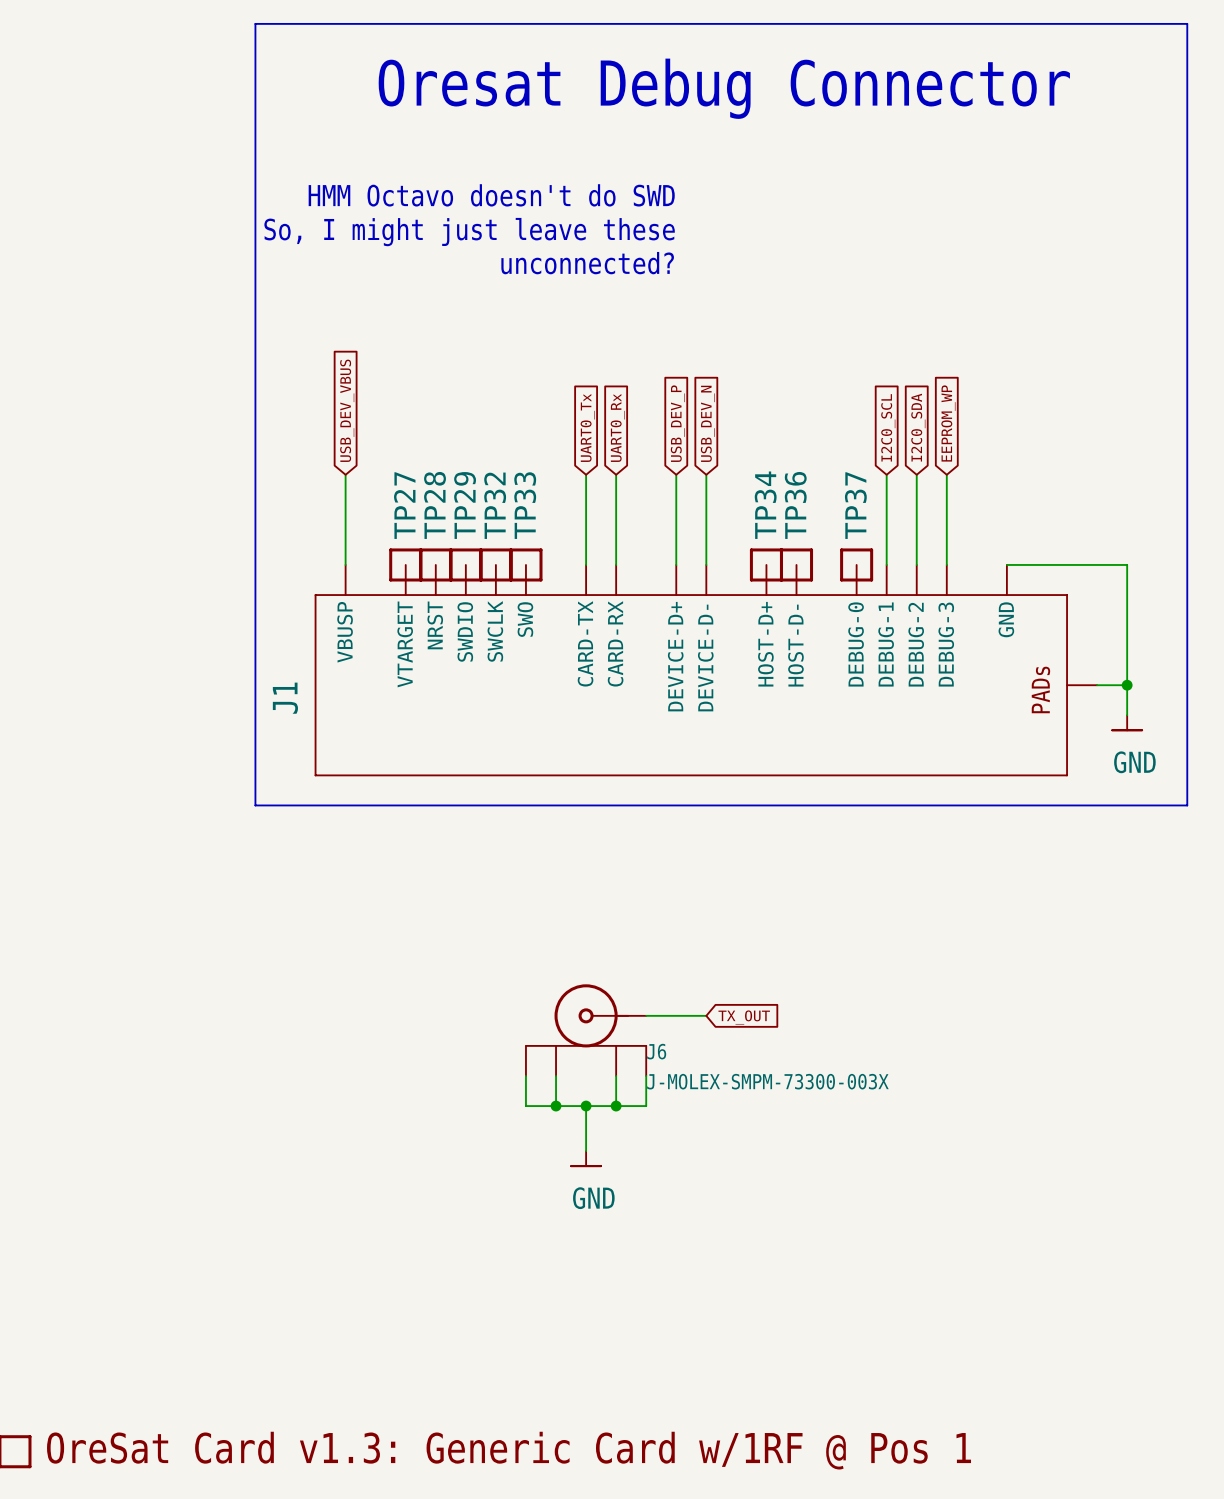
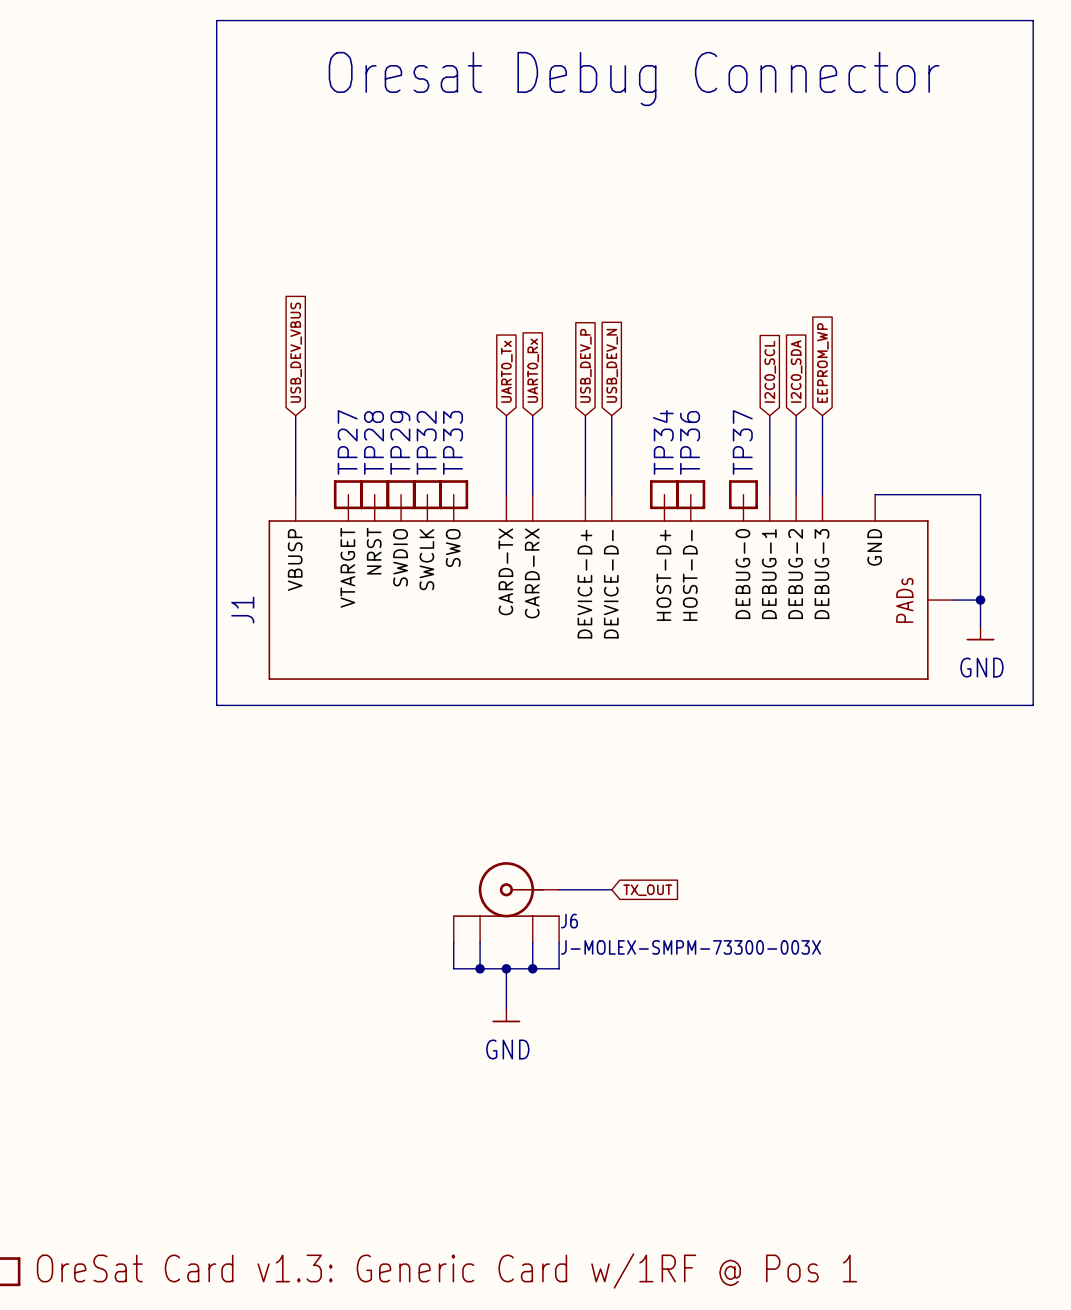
text: HMM Octavo doesn't do SWD (491, 195) -> none
text: So, I might just leave these (469, 232) -> none
text: unconnected? (587, 263) -> none

